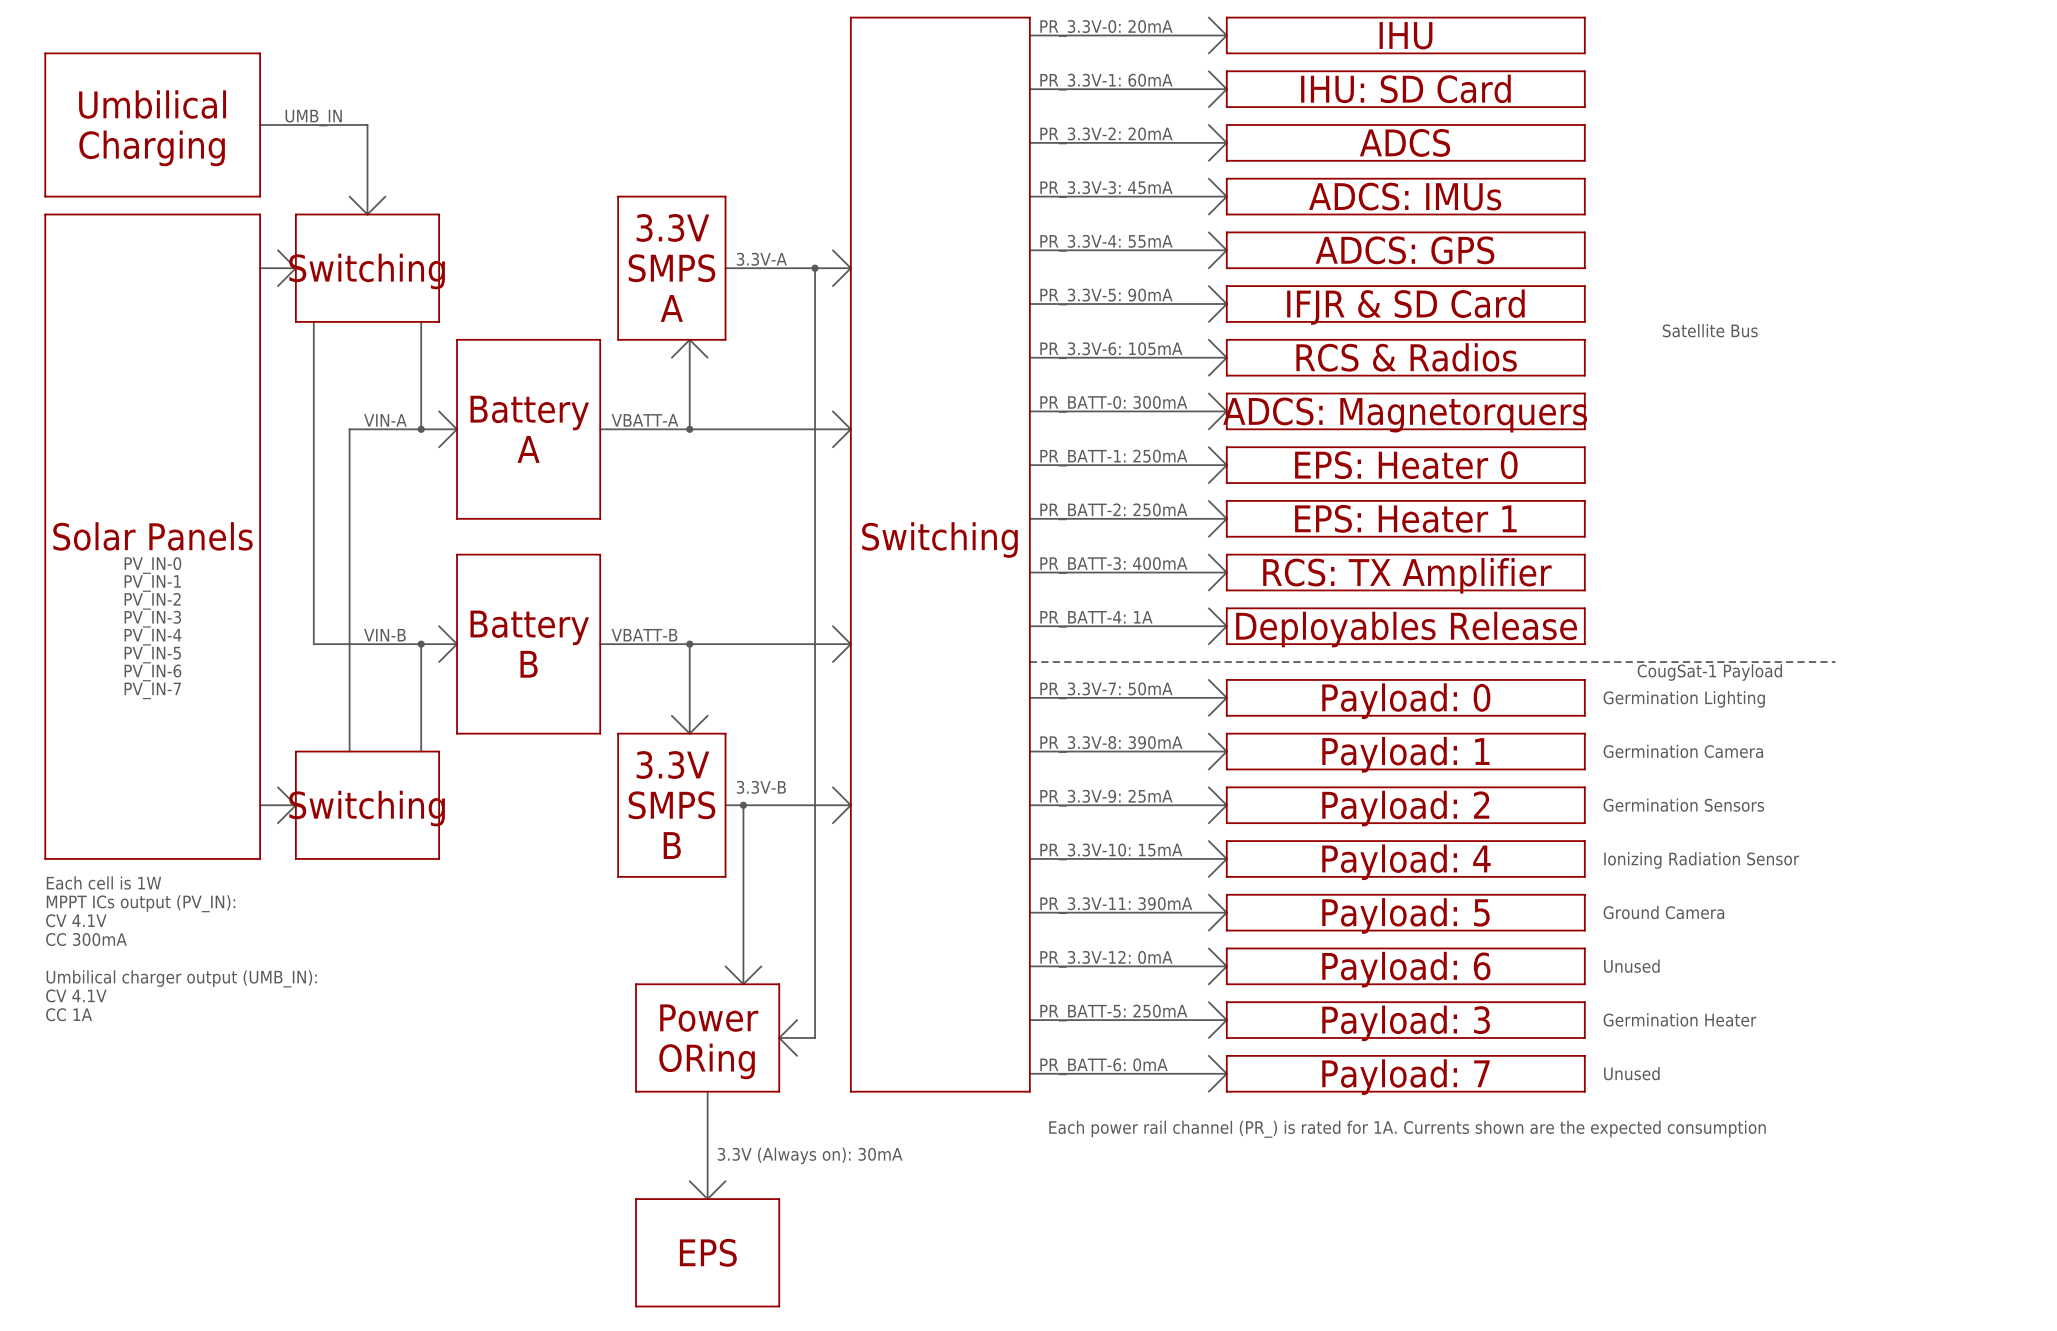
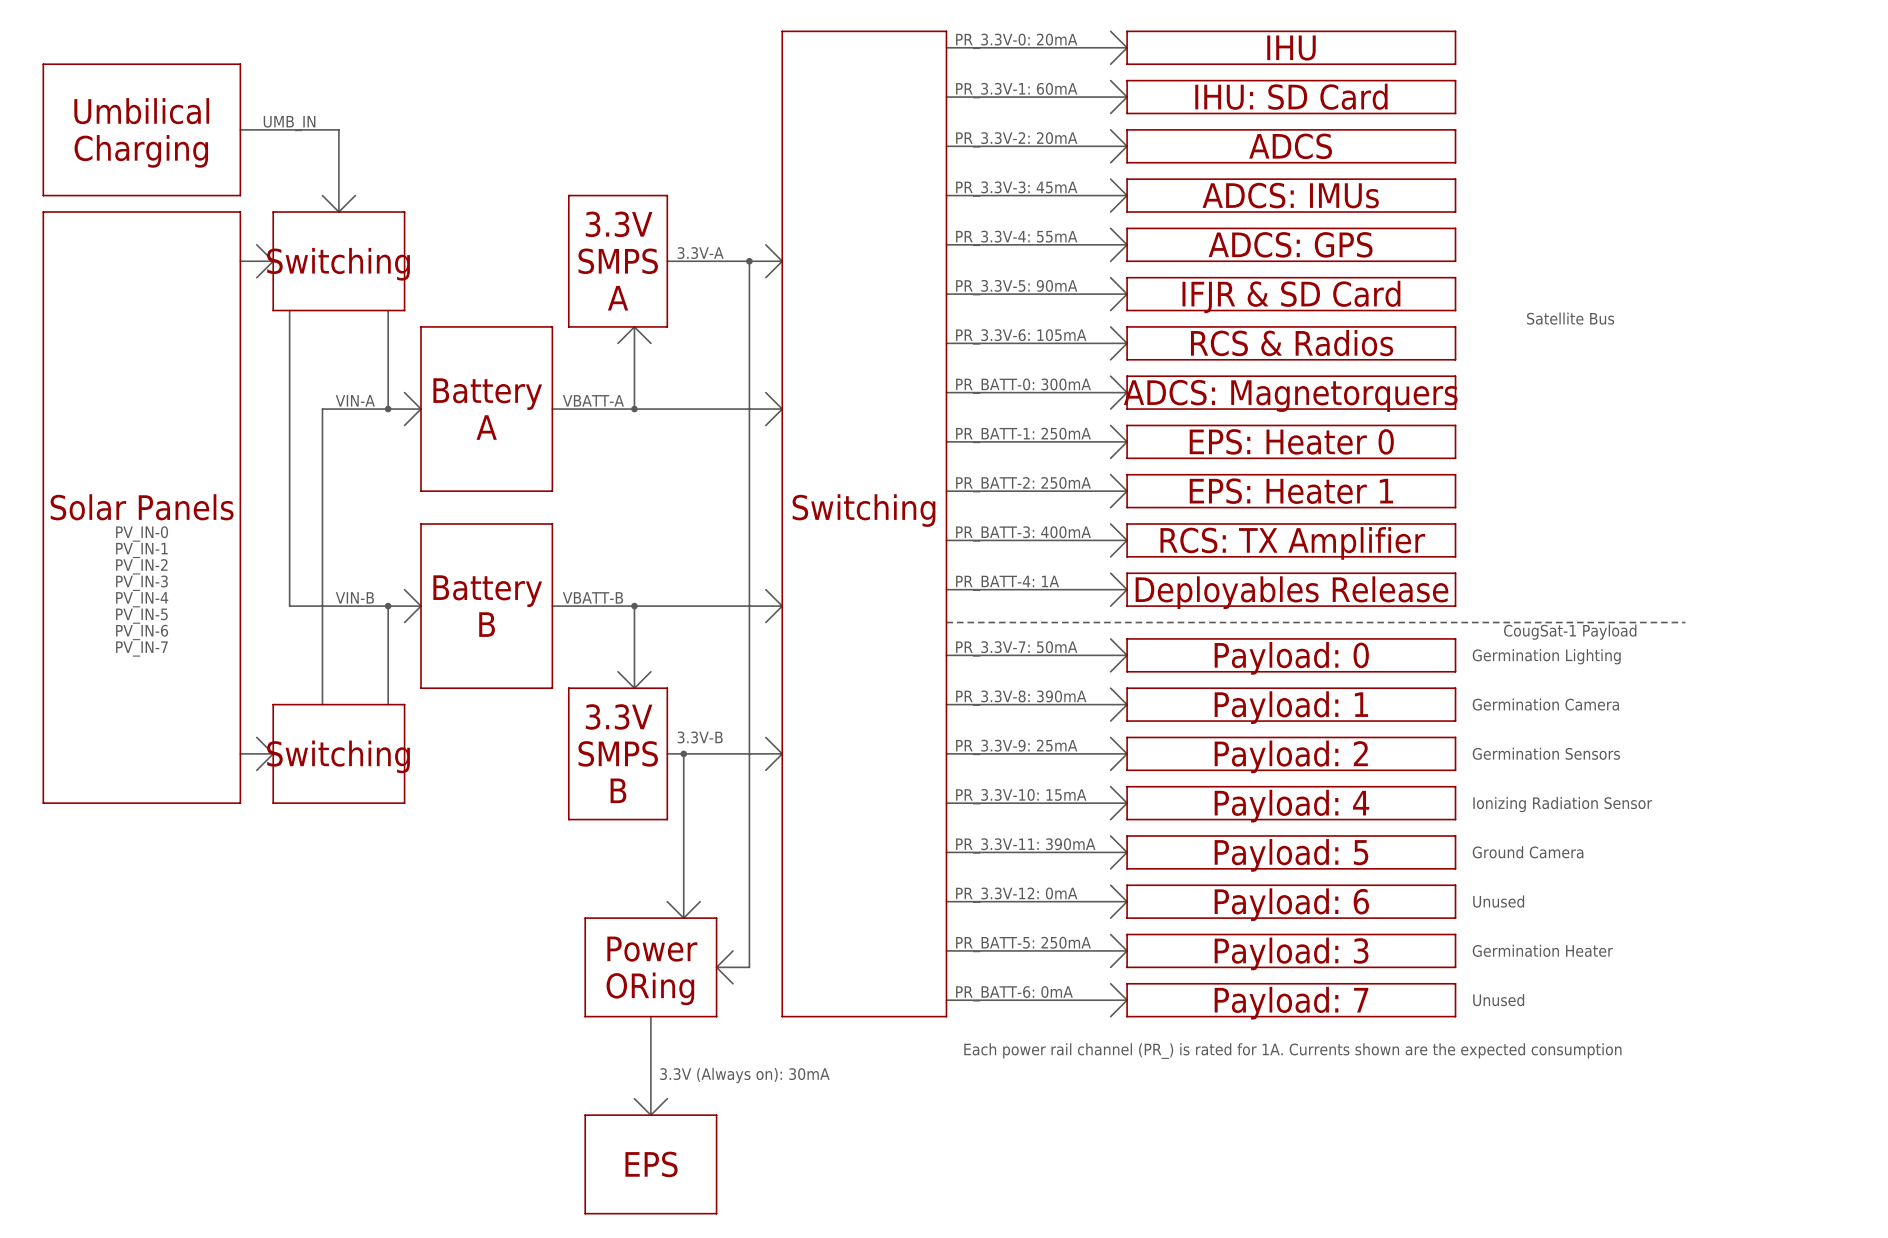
text: Each cell is 1W (103, 882) -> none
text: MPPT ICs output (PV_IN): (140, 903) -> none
text: CV 4.1V (76, 920) -> none
text: CC 300mA (86, 939) -> none
text: Umbilical charger output (UMB_IN): (181, 978) -> none
text: CV 4.1V (76, 995) -> none
text: CC 1A (69, 1014) -> none

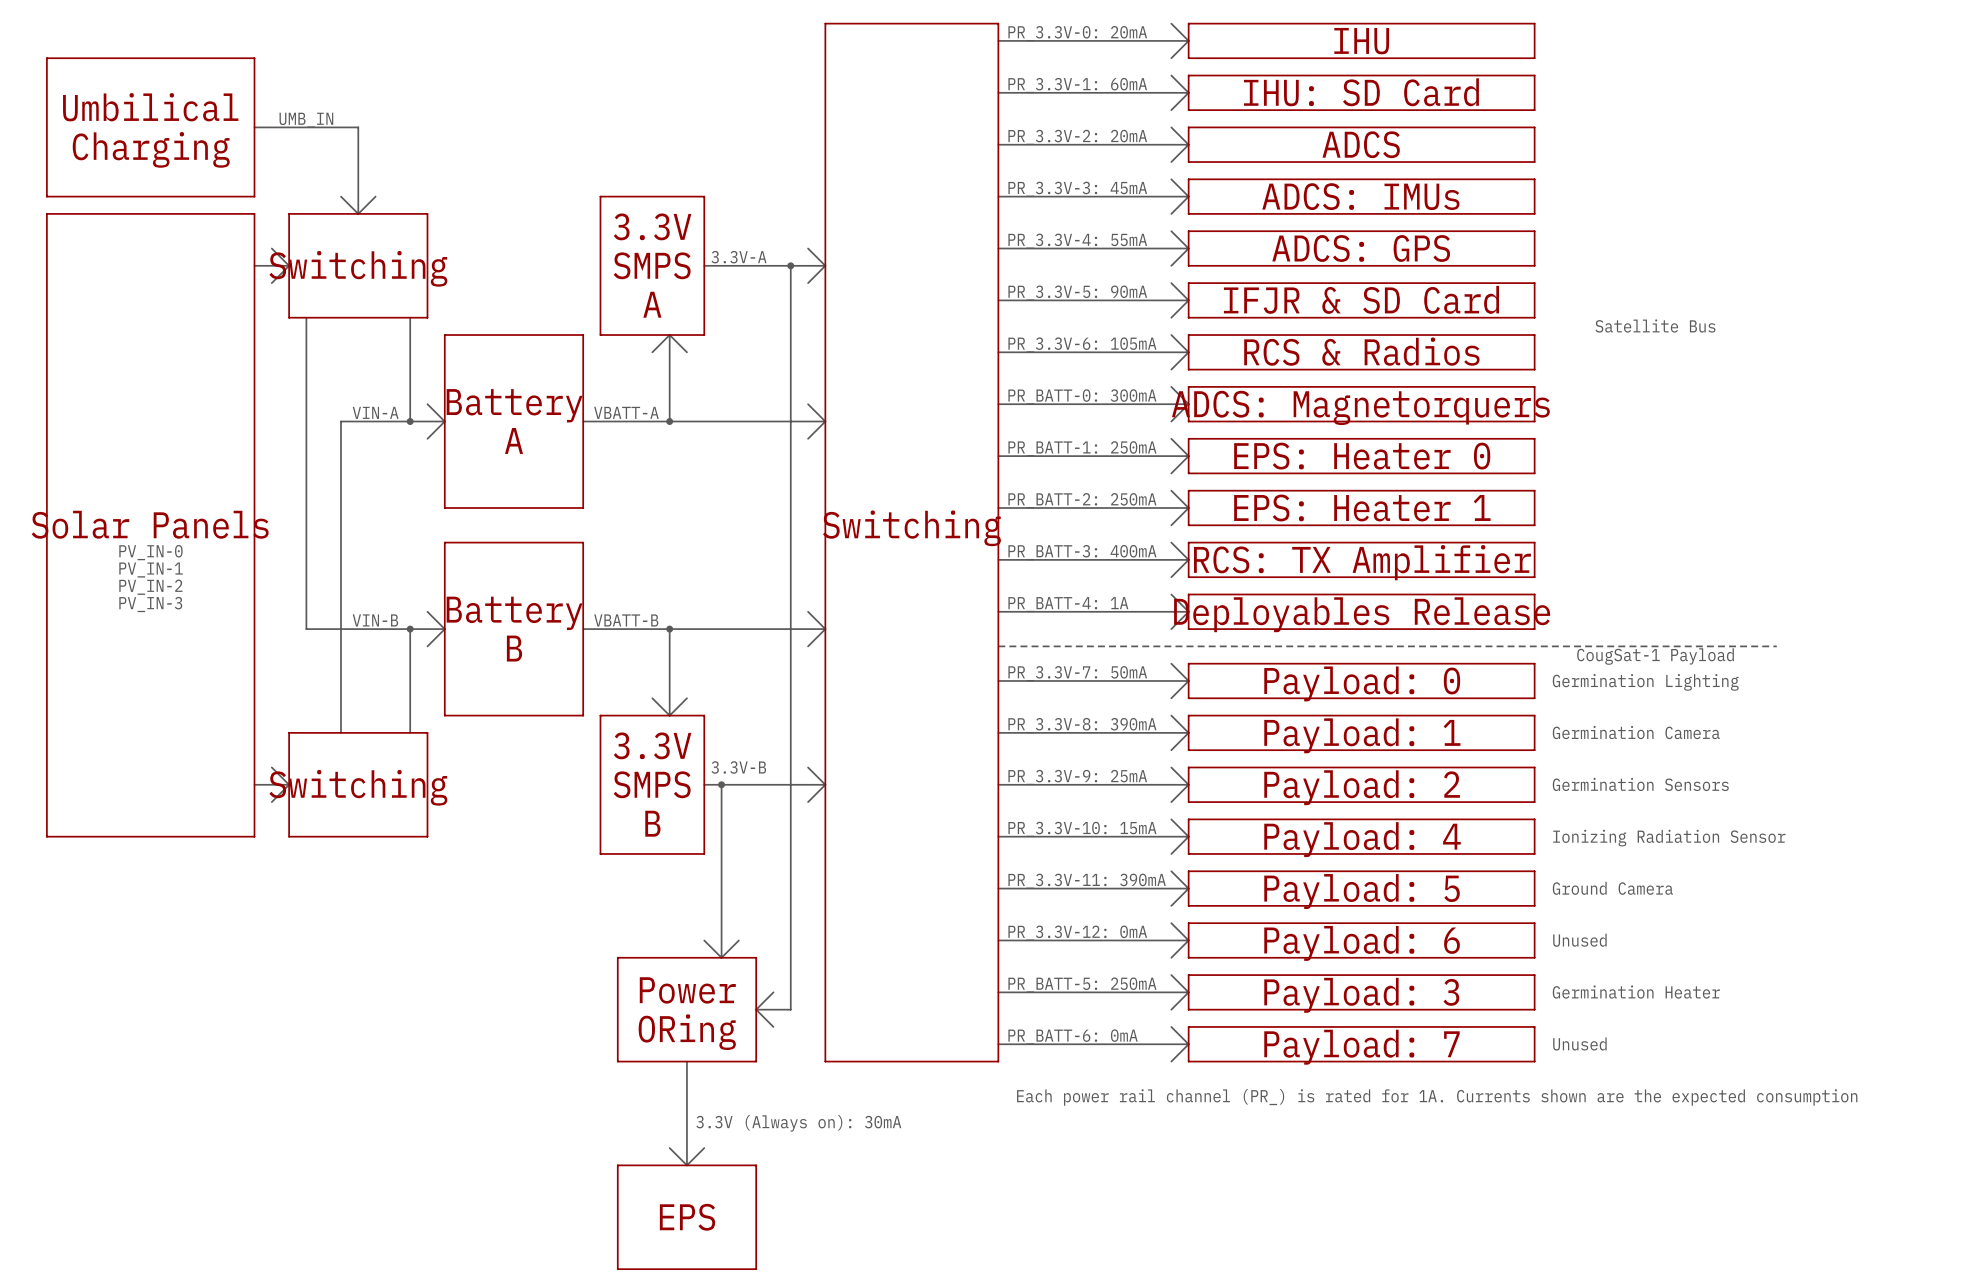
text: PV_IN-4 (142, 599) -> none
text: PV_IN-5 (141, 616) -> none
text: PV_IN-6 (142, 632) -> none
text: PV_IN-7 (141, 649) -> none

